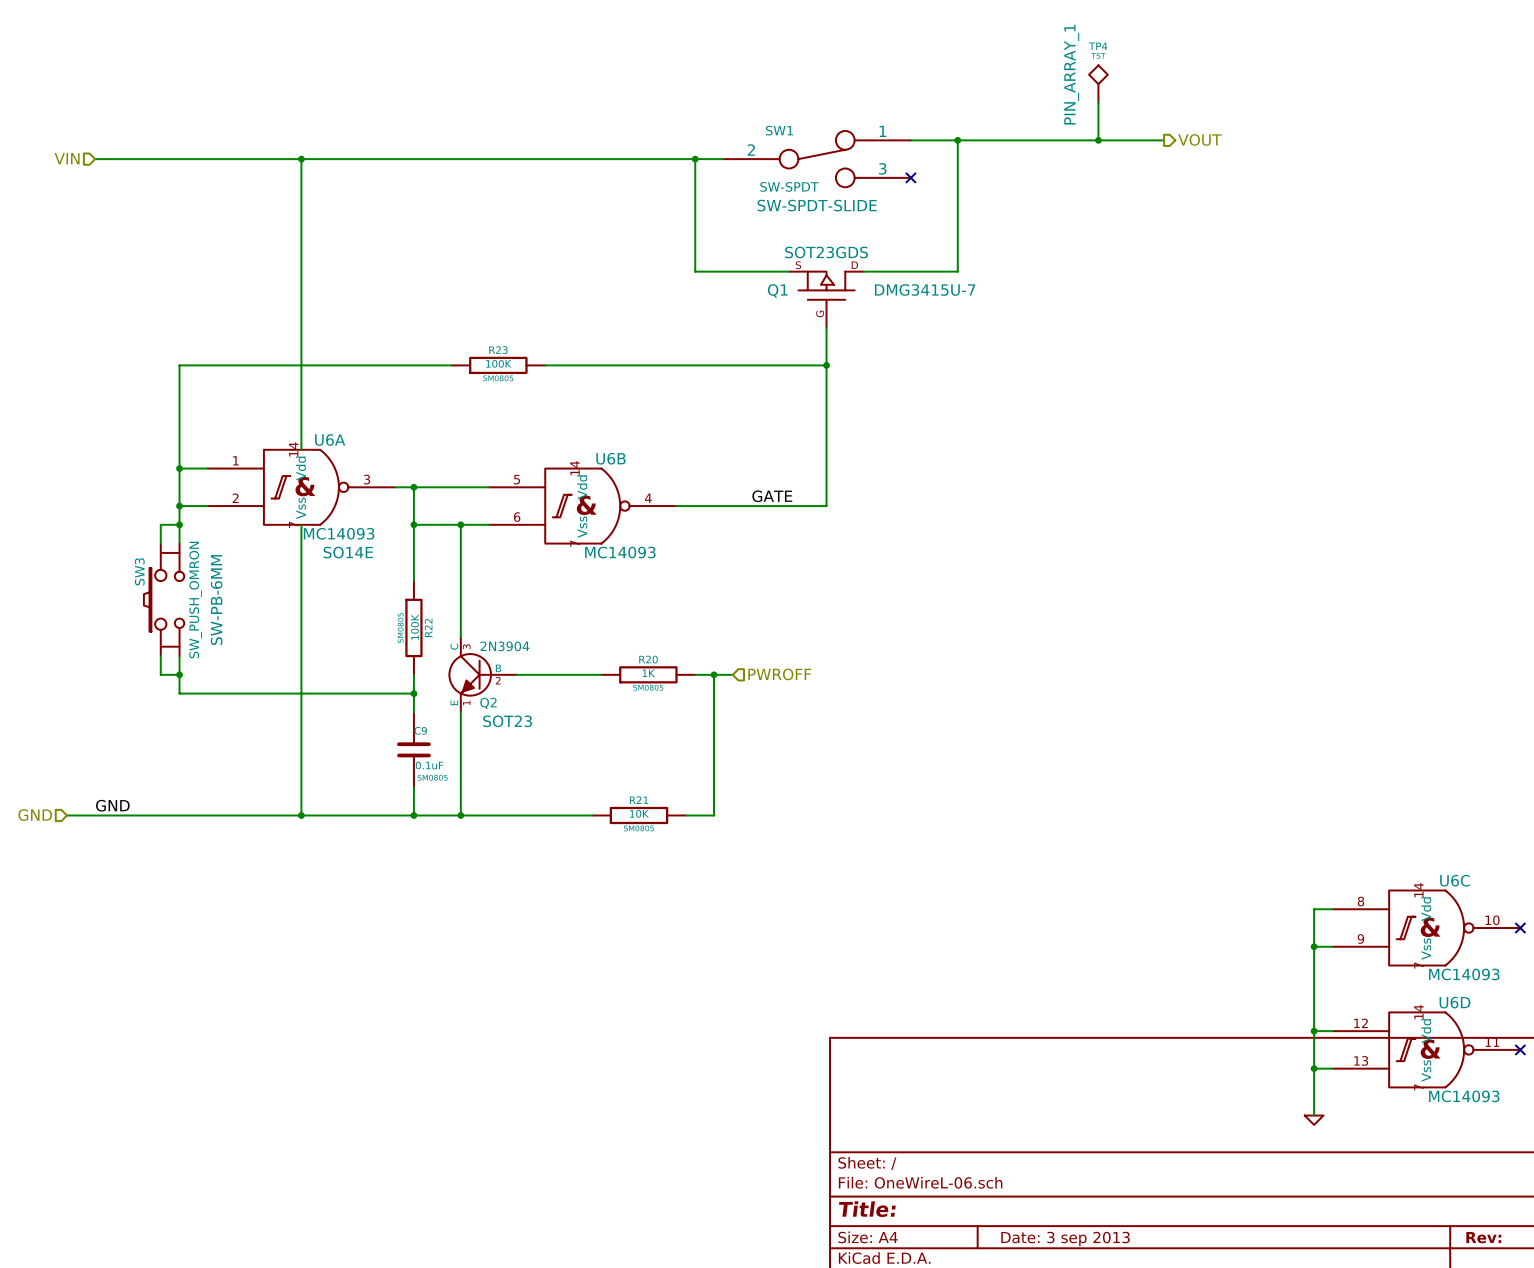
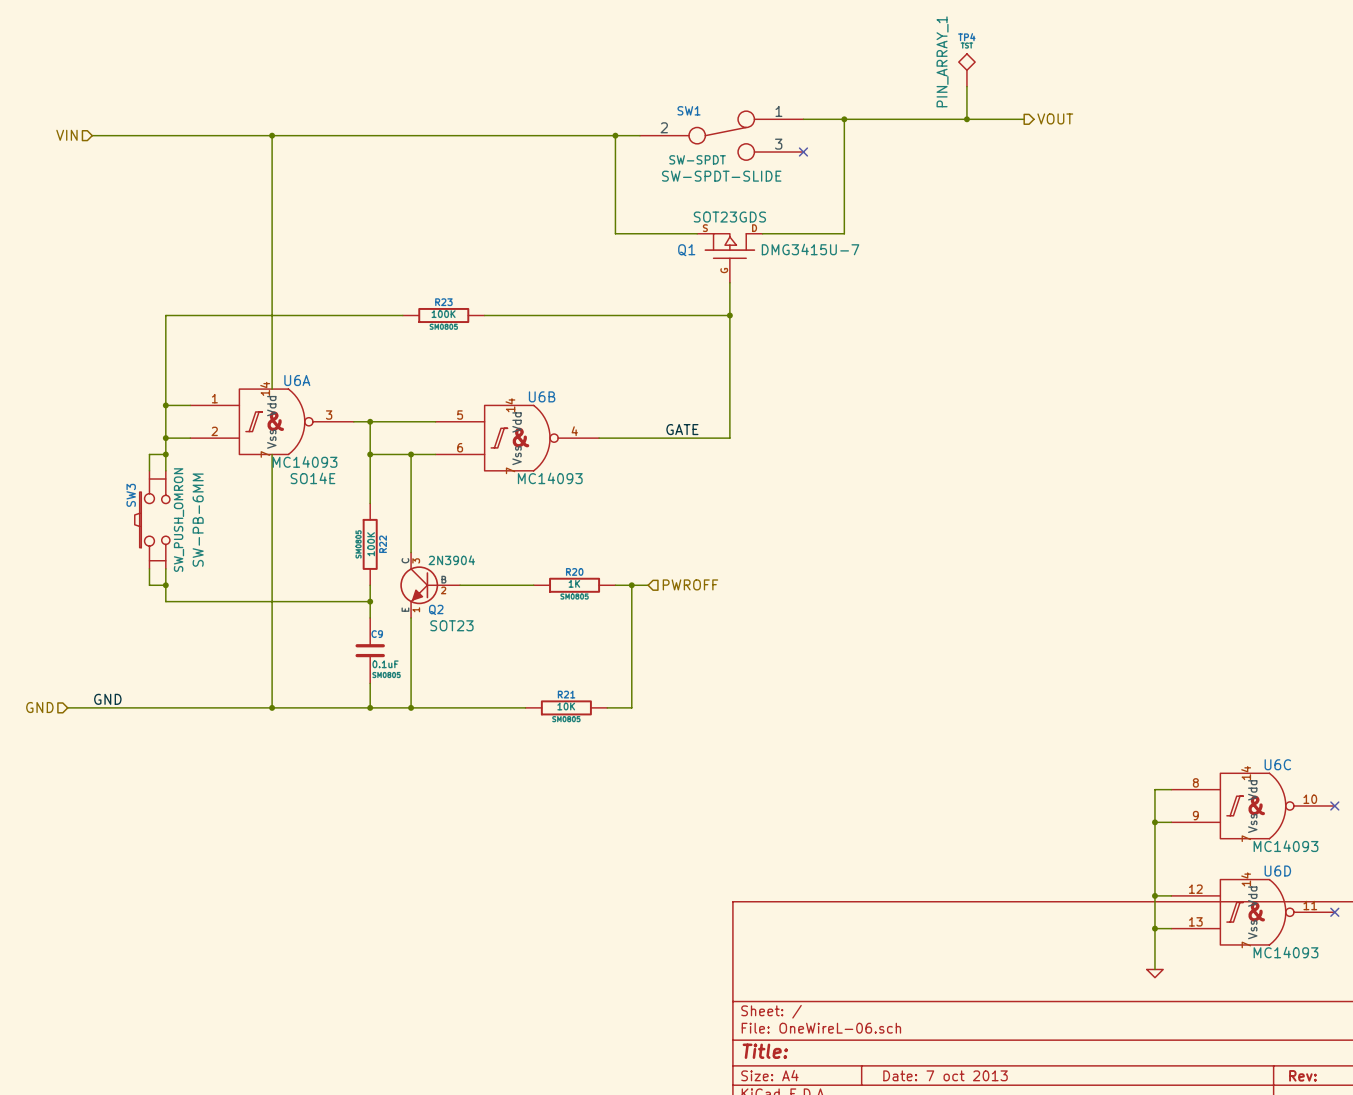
title block: Date: 3 sep 2013 (1065, 1239) -> Date: 7 oct 2013 (945, 1075)

